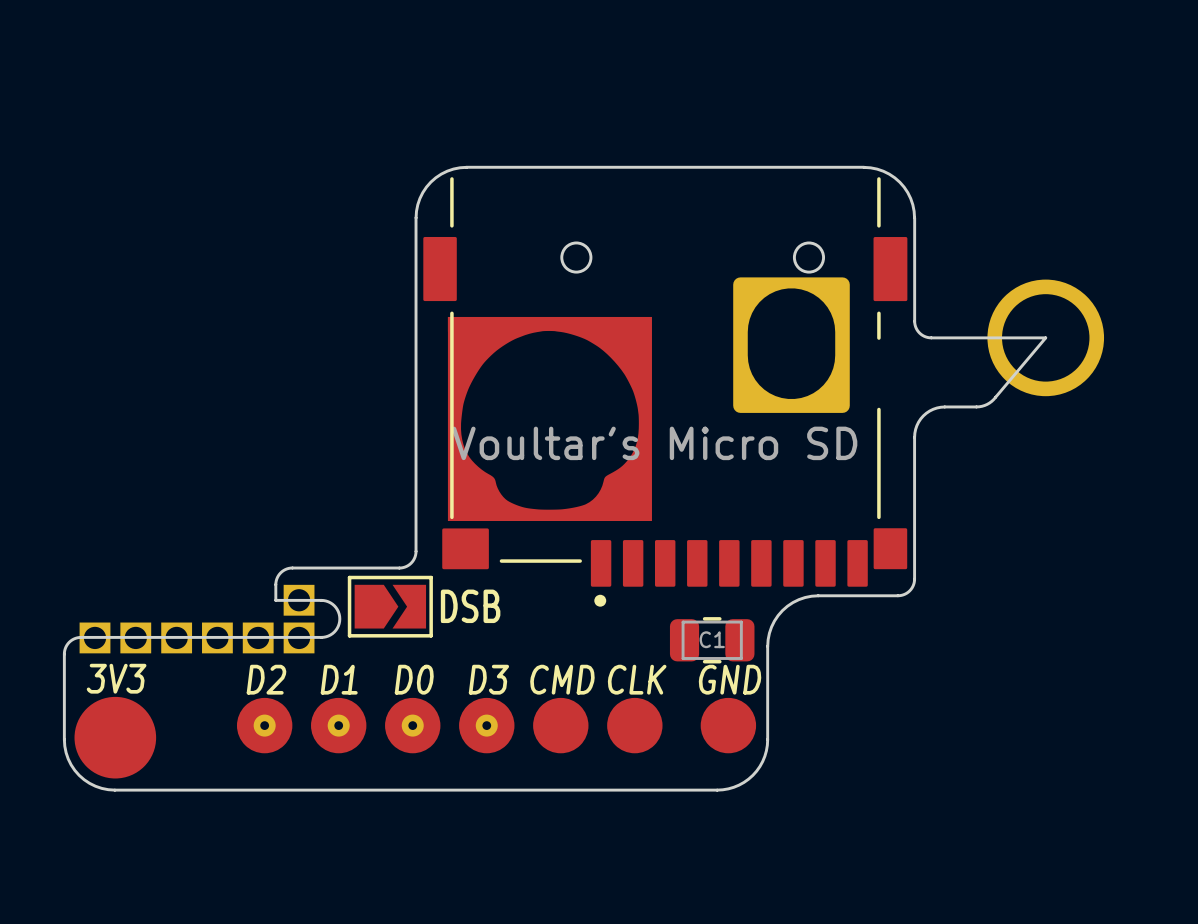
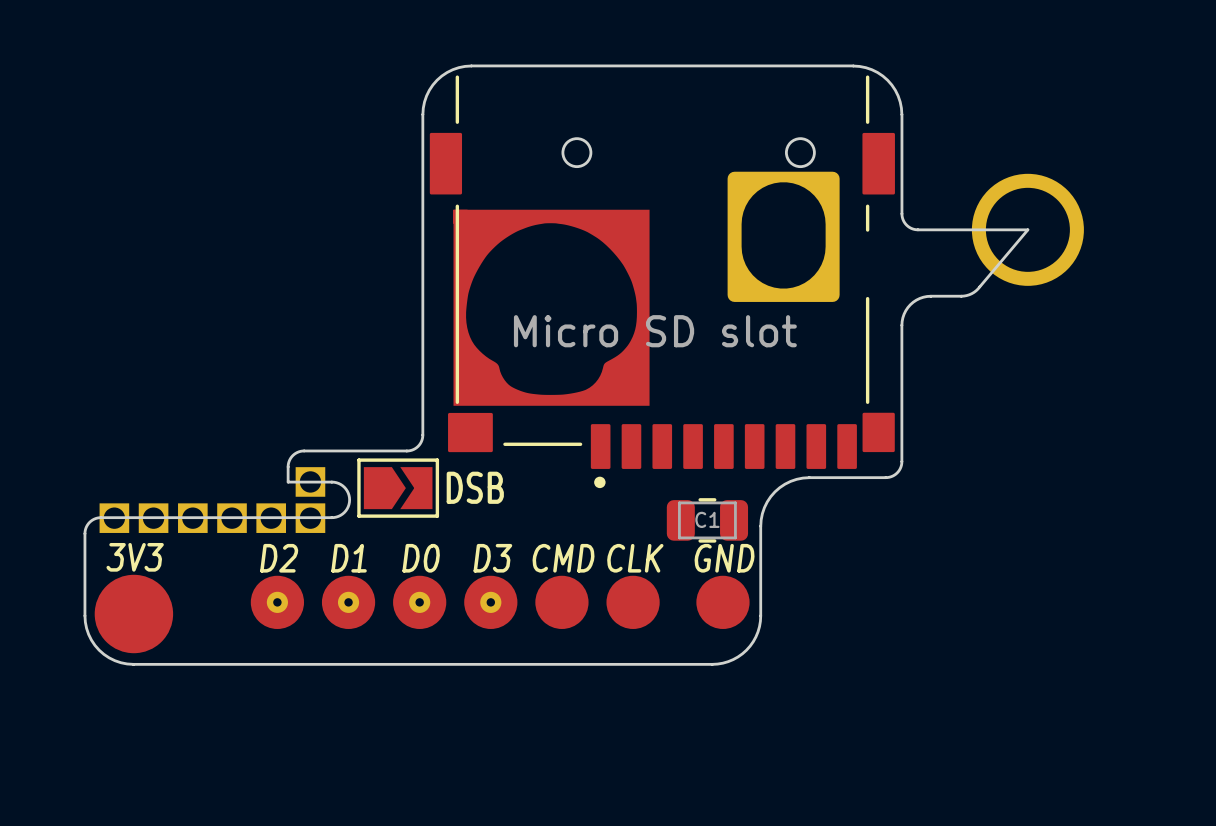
part value: Voultar's Micro SD (654, 443) -> Micro SD slot (655, 331)

